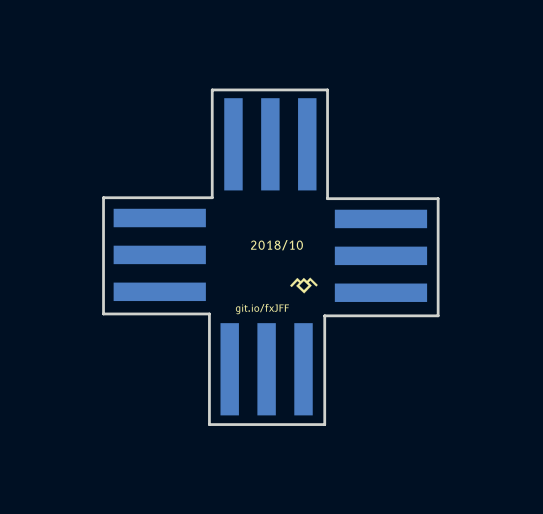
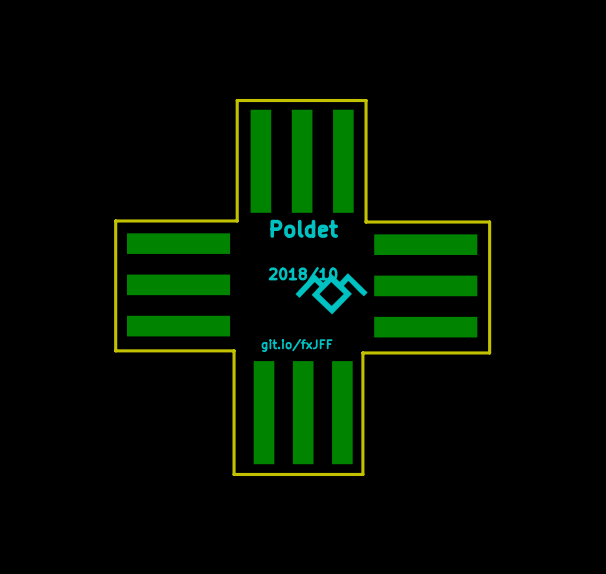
text: none -> Poldet (304, 228)
drawing: none -> [295, 273, 368, 315]
drawing: [290, 277, 318, 294] -> none
part footprint: [220, 323, 313, 416] -> [253, 361, 353, 465]

